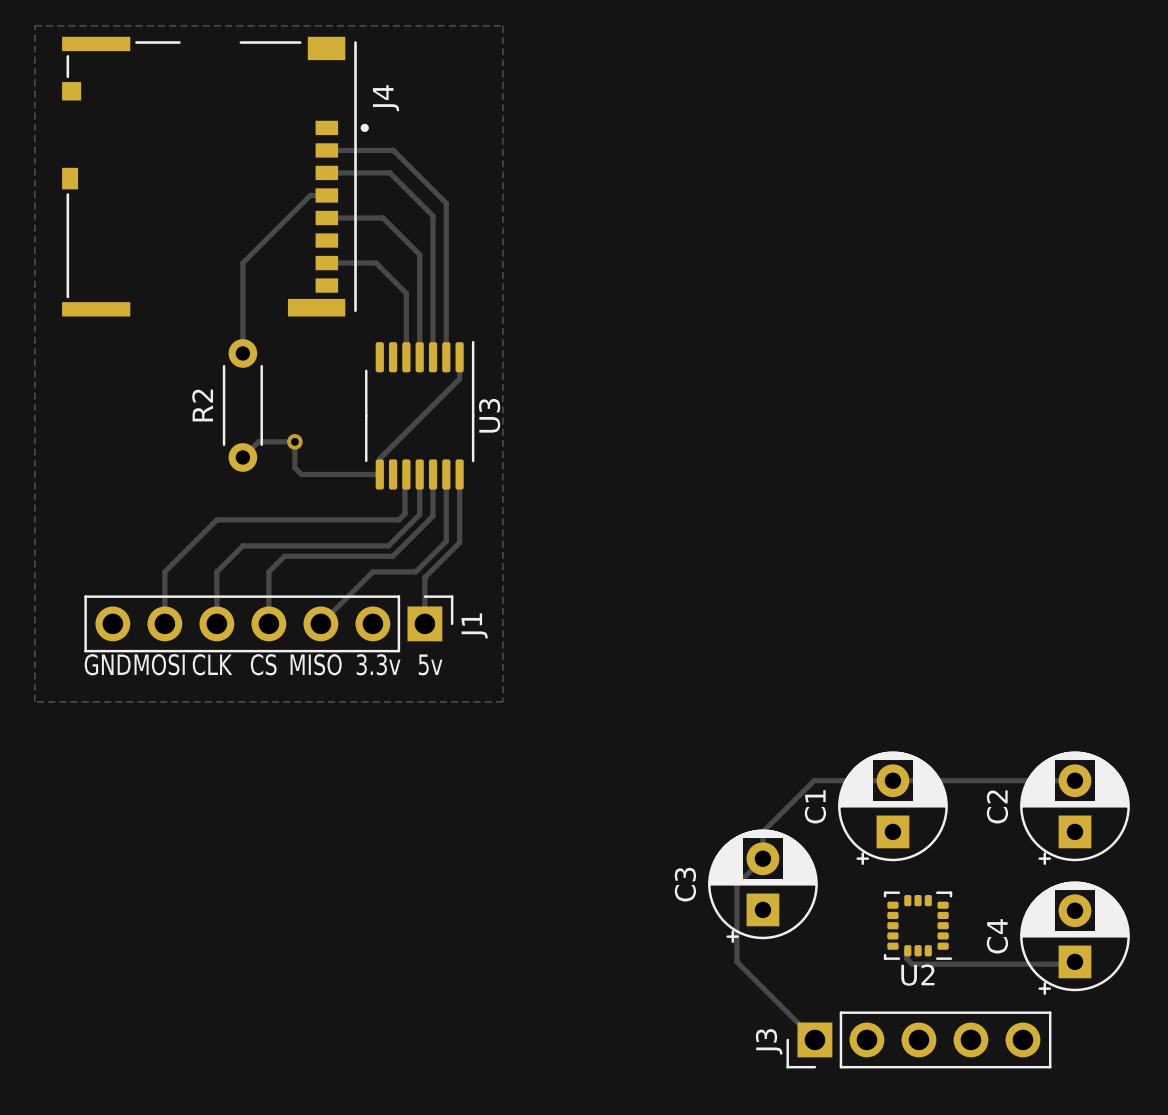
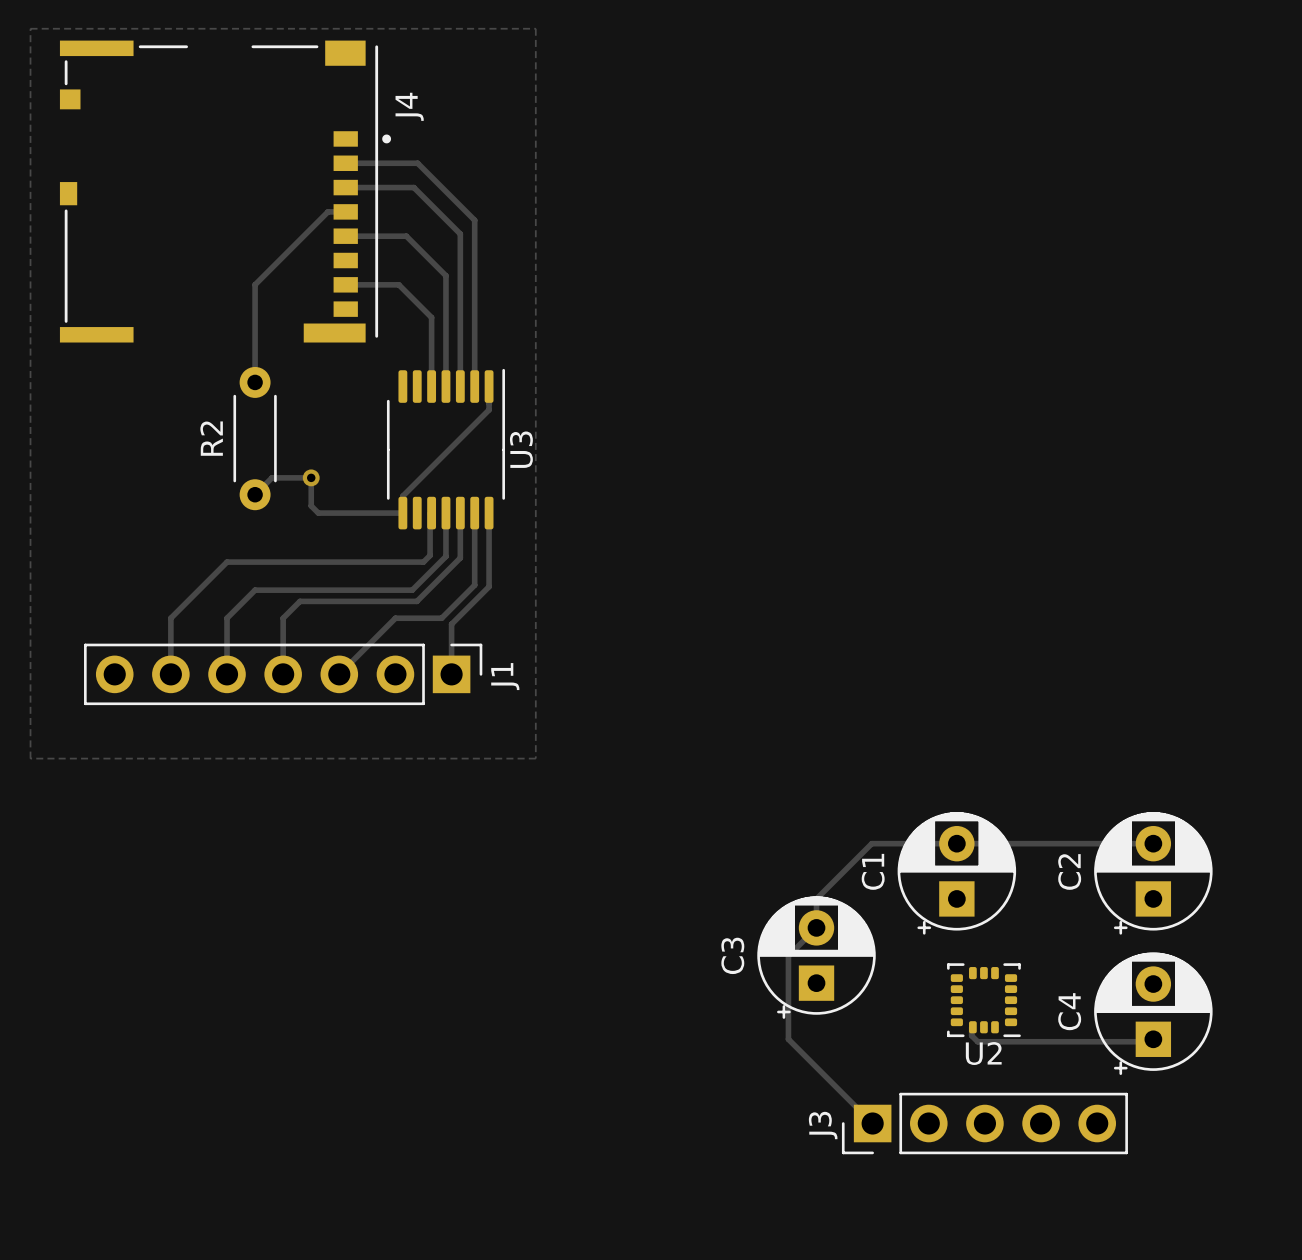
text: GND (107, 664) -> none
text: MOSI (159, 664) -> none
text: CLK (212, 664) -> none
text: CS (263, 664) -> none
text: MISO (316, 664) -> none
text: 3.3v (378, 664) -> none
text: 5v (430, 664) -> none

